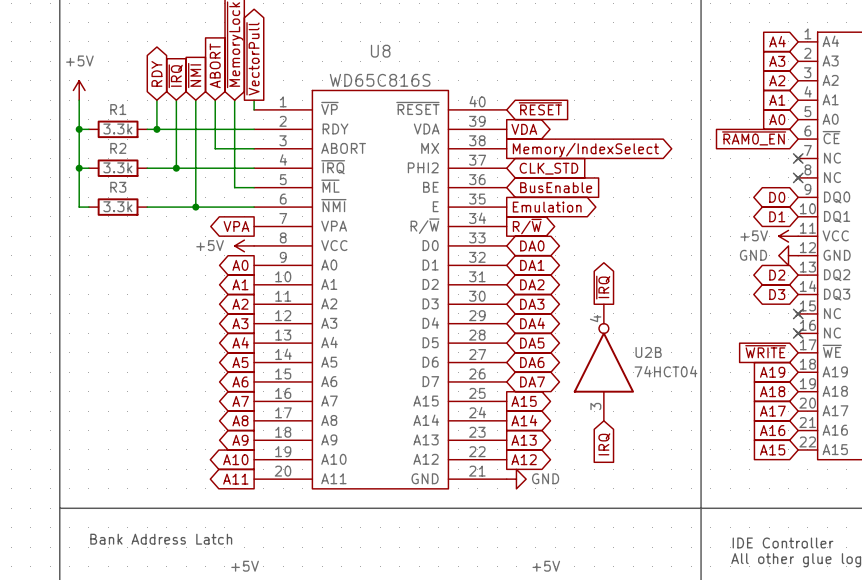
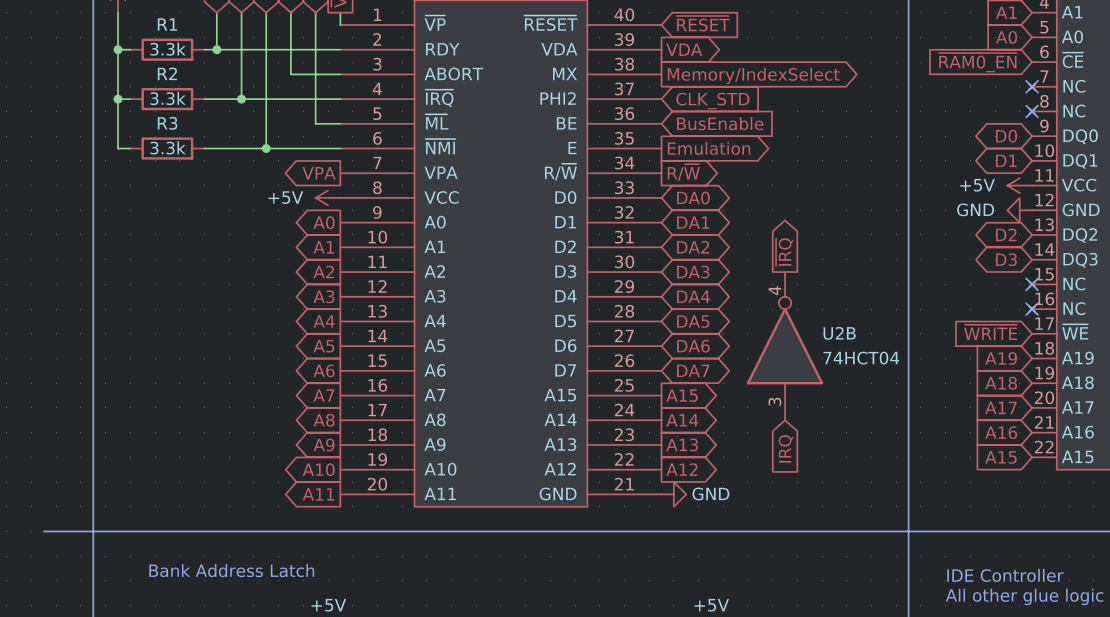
line: none -> (43, 531) (93, 531)

